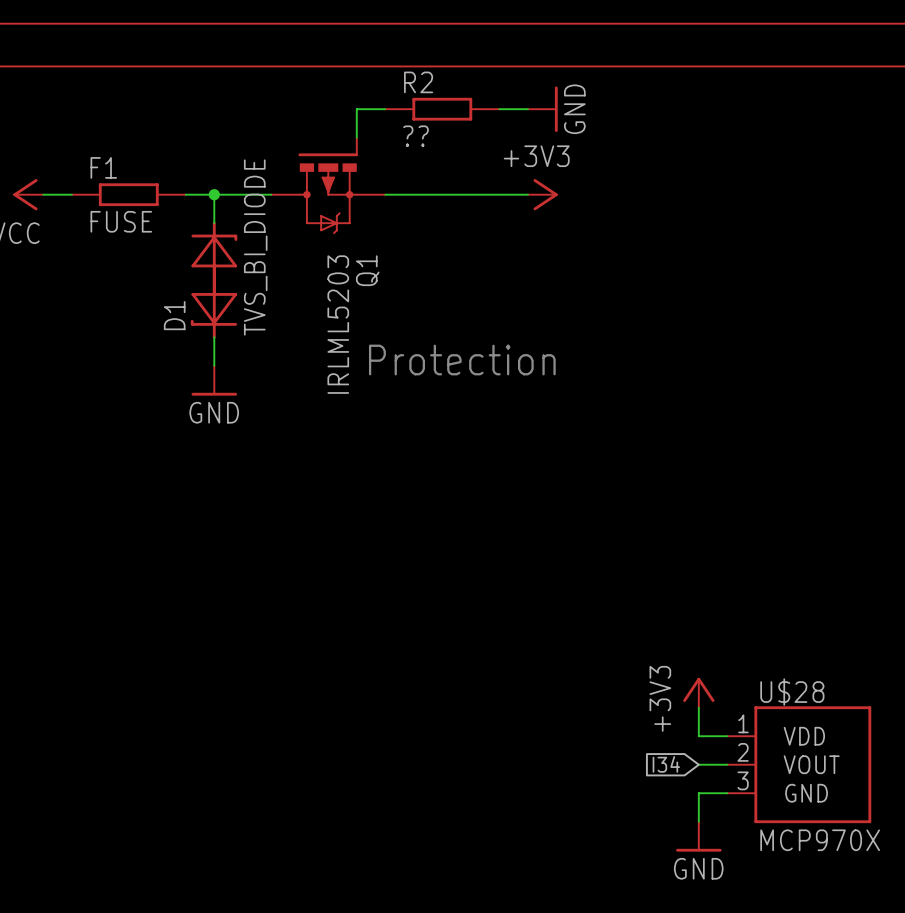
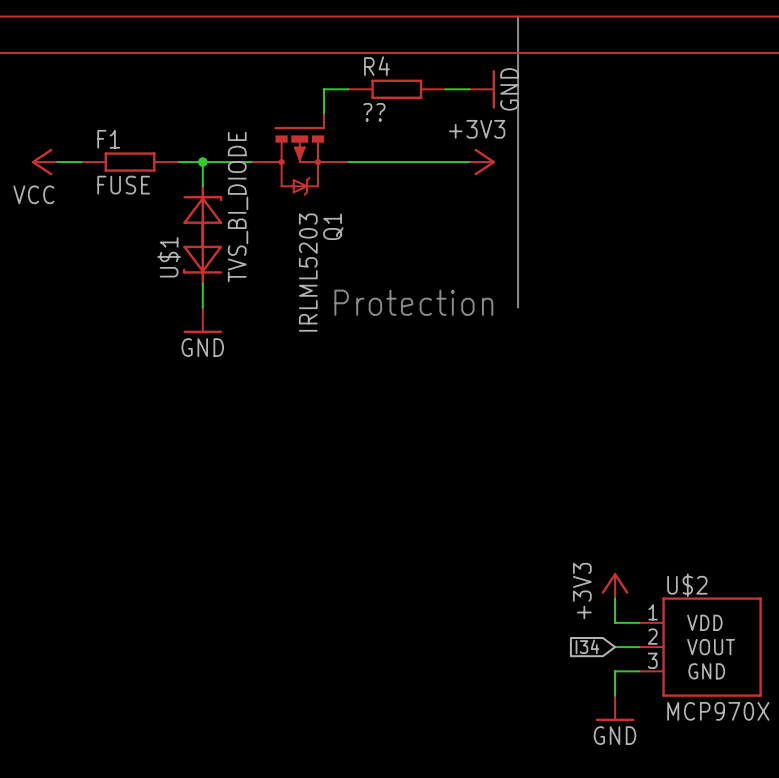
line: none -> (518, 16) (518, 307)
R2 name: R2 (418, 82) -> R4 (376, 66)
D1 name: D1 (174, 315) -> U$1 (169, 257)
U$28 name: U$28 (792, 692) -> U$2 (687, 585)

